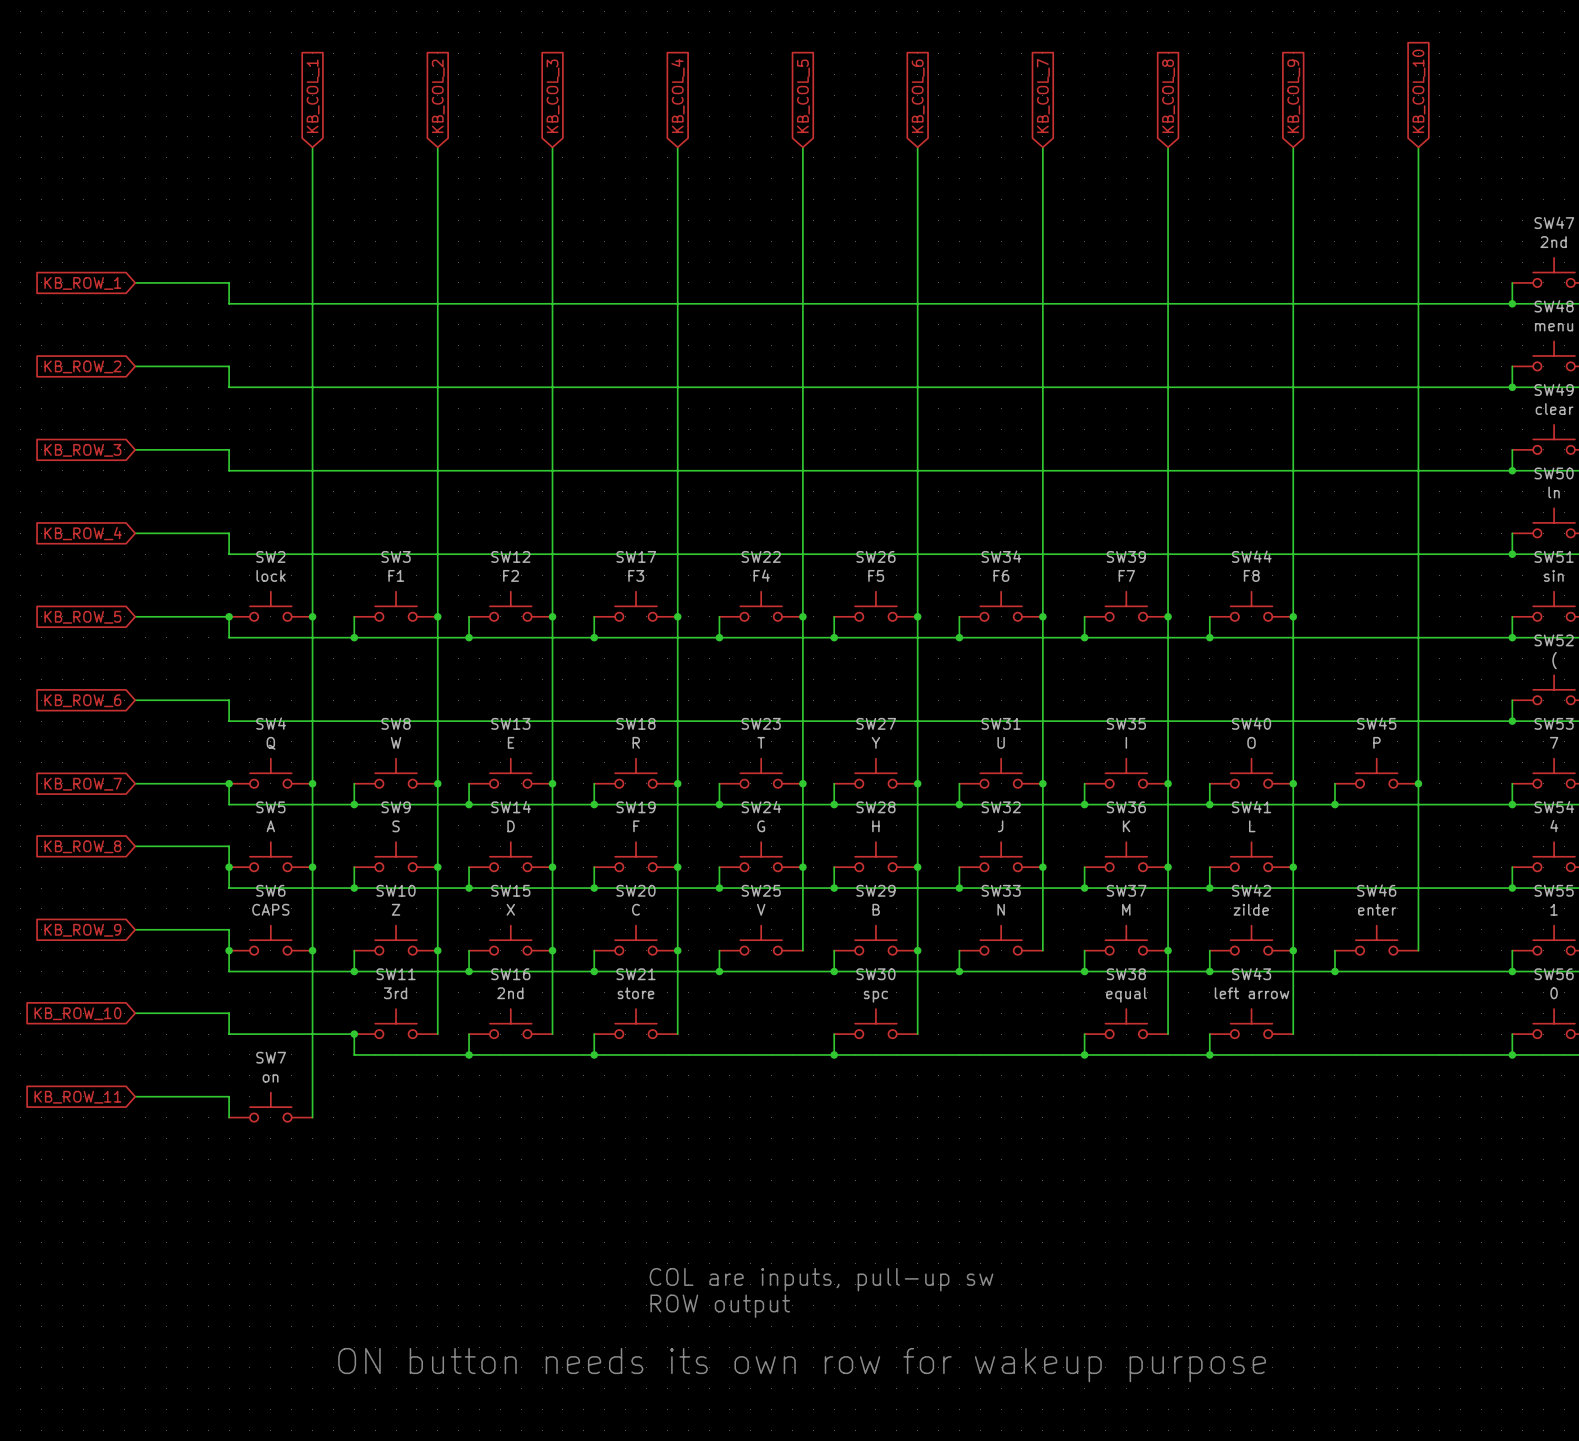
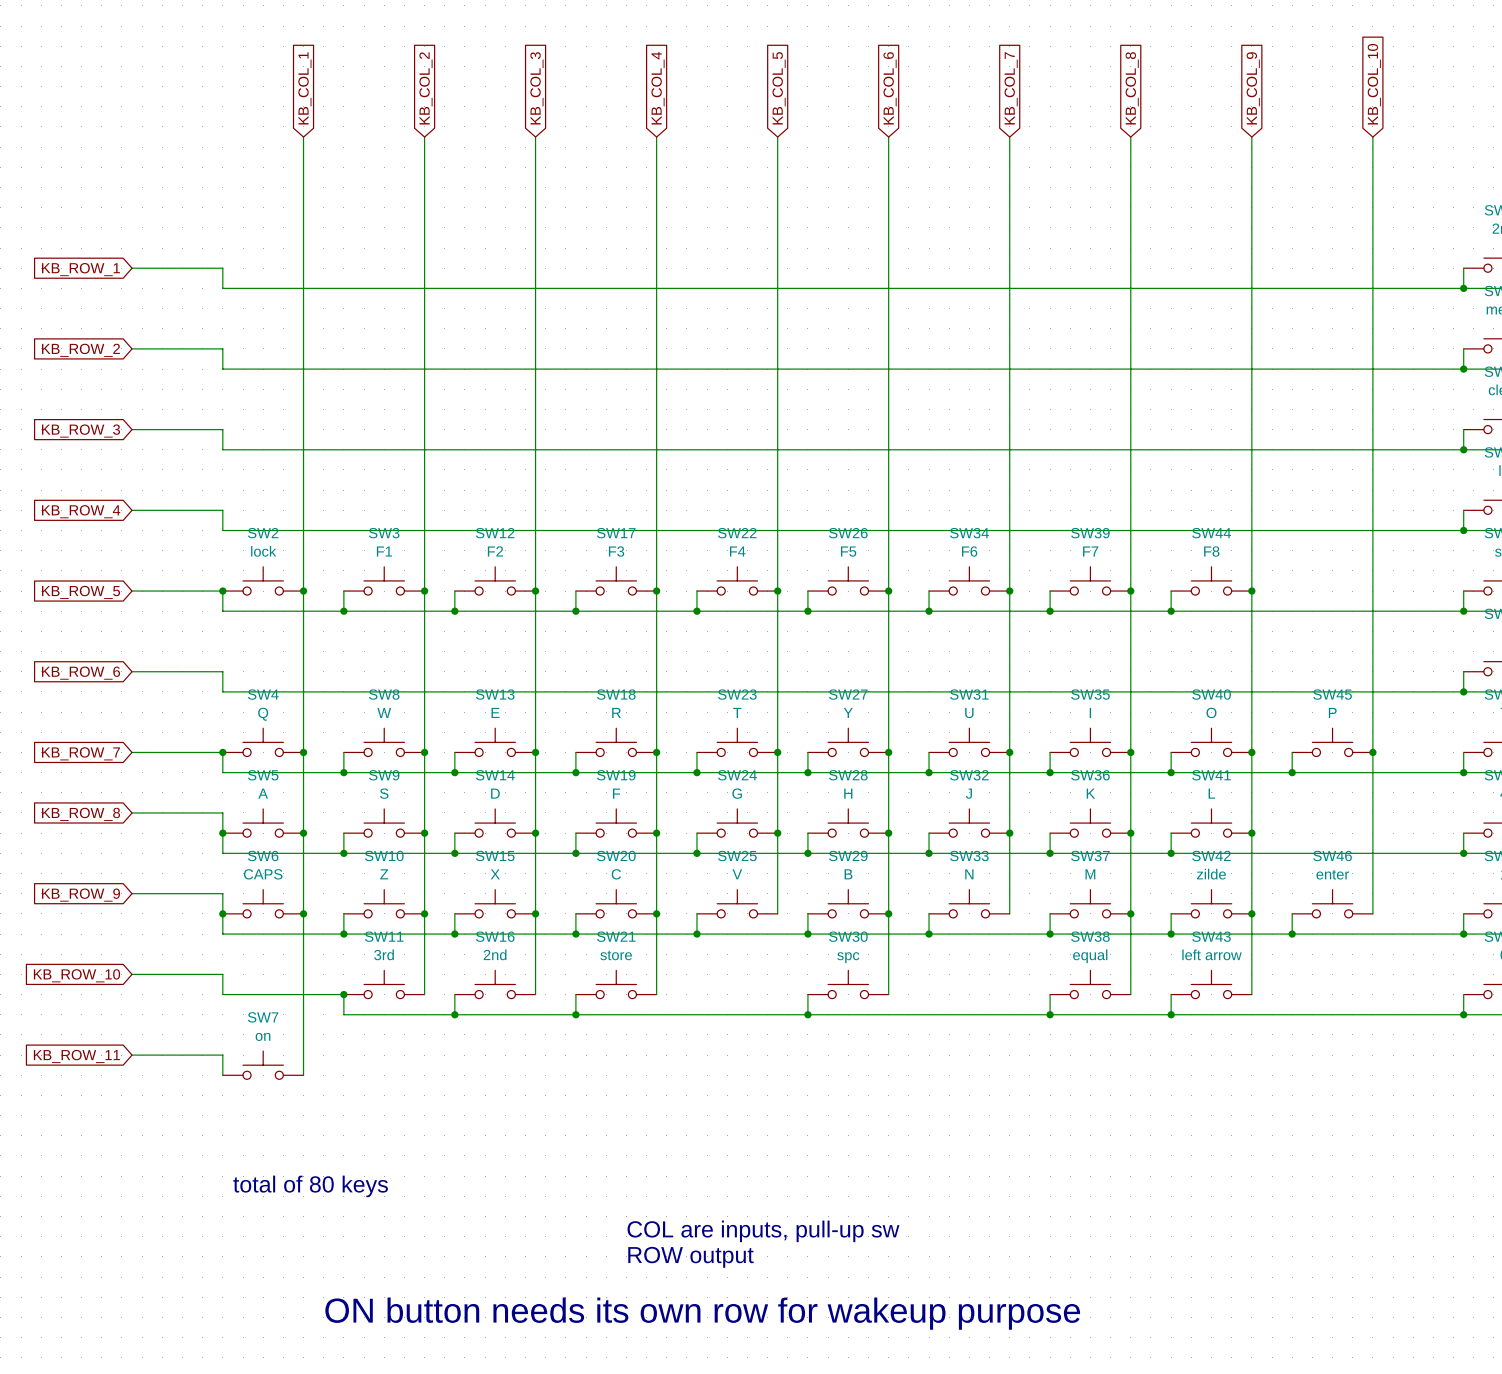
text: none -> total of 80 keys (310, 1186)

